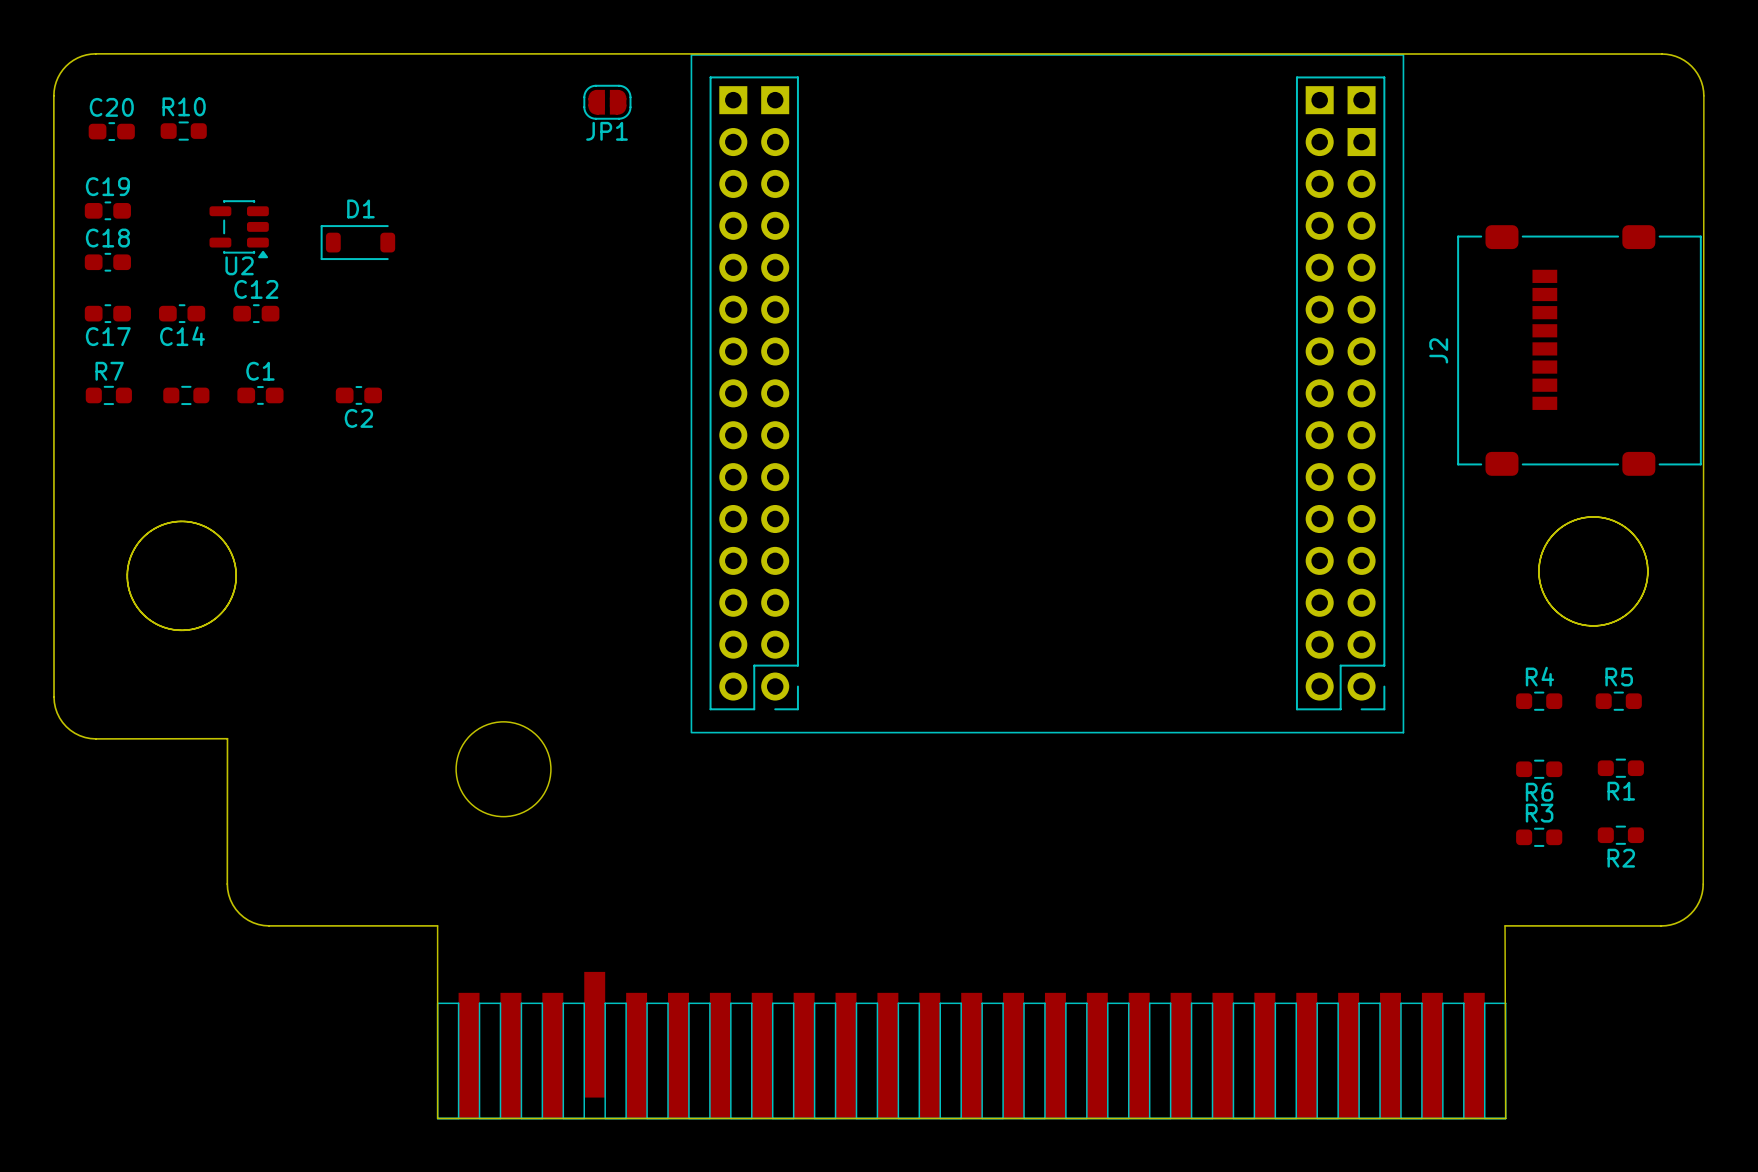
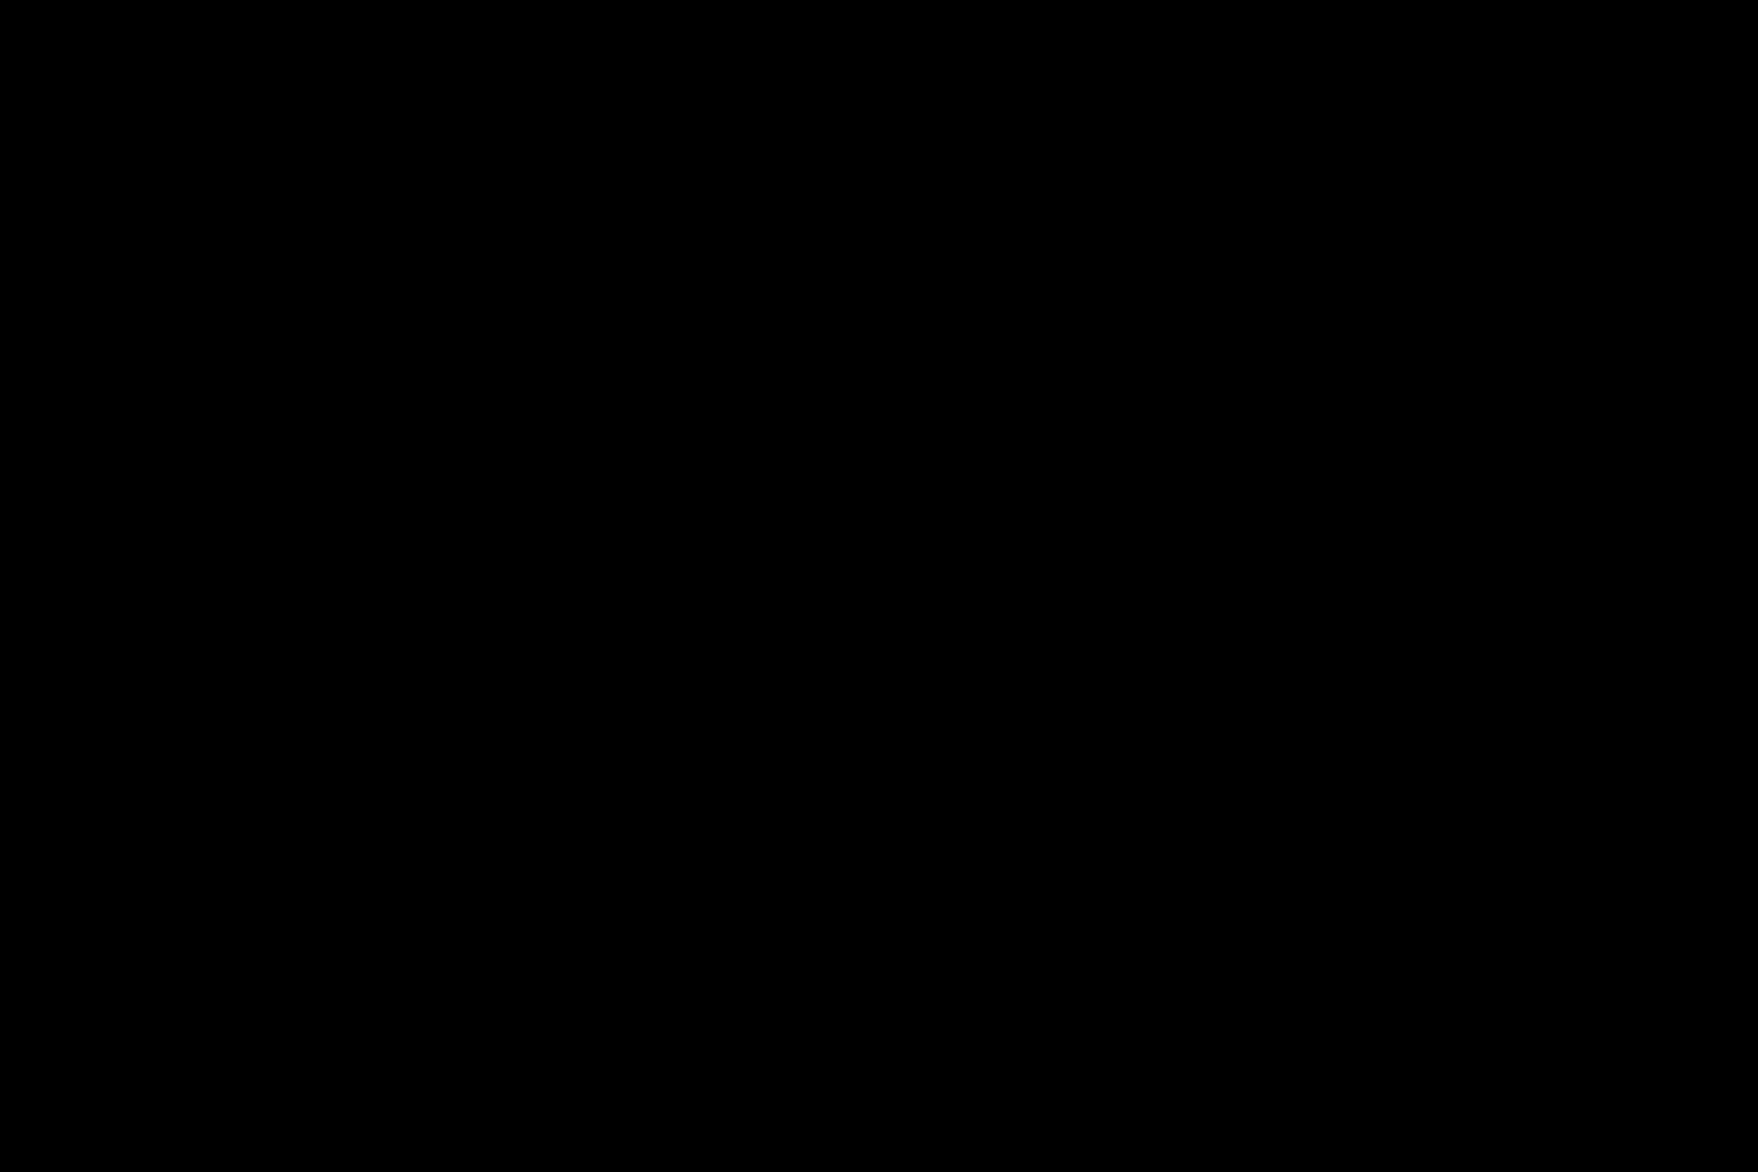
board edge: (95, 53) (1661, 54) (1680, 58) (1691, 66) (1697, 73) (1701, 82) (1703, 95) (1703, 884) (1699, 902) (1687, 916) (1679, 921) (1666, 925) (1505, 925) (1505, 1118) (437, 1118) (437, 925) (269, 925) (248, 920) (232, 904) (227, 889) (227, 738) (90, 738) (74, 733) (66, 726) (55, 707) (54, 91) (58, 77) (69, 63) (81, 56) (95, 53) -> none
JP1: (607, 102) -> none
C20: (111, 131) -> none
R10: (183, 131) -> none
C19: (107, 210) -> none
U2: (239, 229) -> none
D1: (357, 242) -> none
C18: (107, 262) -> none
C17: (107, 313) -> none
C14: (182, 313) -> none
C12: (256, 313) -> none
J2: (1579, 350) -> none
part: (1047, 393) -> none
R7: (108, 395) -> none
part: (186, 395) -> none
C1: (260, 395) -> none
C2: (358, 395) -> none
board edge: (1590, 517) (1570, 522) (1553, 534) (1542, 553) (1538, 574) (1544, 594) (1556, 611) (1575, 622) (1596, 625) (1616, 620) (1633, 607) (1644, 589) (1647, 568) (1642, 548) (1629, 531) (1611, 520) (1590, 517) -> none
board edge: (179, 521) (200, 524) (218, 535) (230, 552) (236, 573) (233, 594) (222, 612) (205, 625) (184, 630) (163, 627) (145, 616) (132, 599) (127, 578) (130, 557) (141, 539) (158, 526) (179, 521) -> none
R4: (1539, 701) -> none
R5: (1618, 701) -> none
round board edge: [455, 721, 552, 818] -> none
R1: (1620, 768) -> none
R6: (1539, 769) -> none
R2: (1620, 835) -> none
R3: (1539, 837) -> none
part: (971, 1045) -> none

